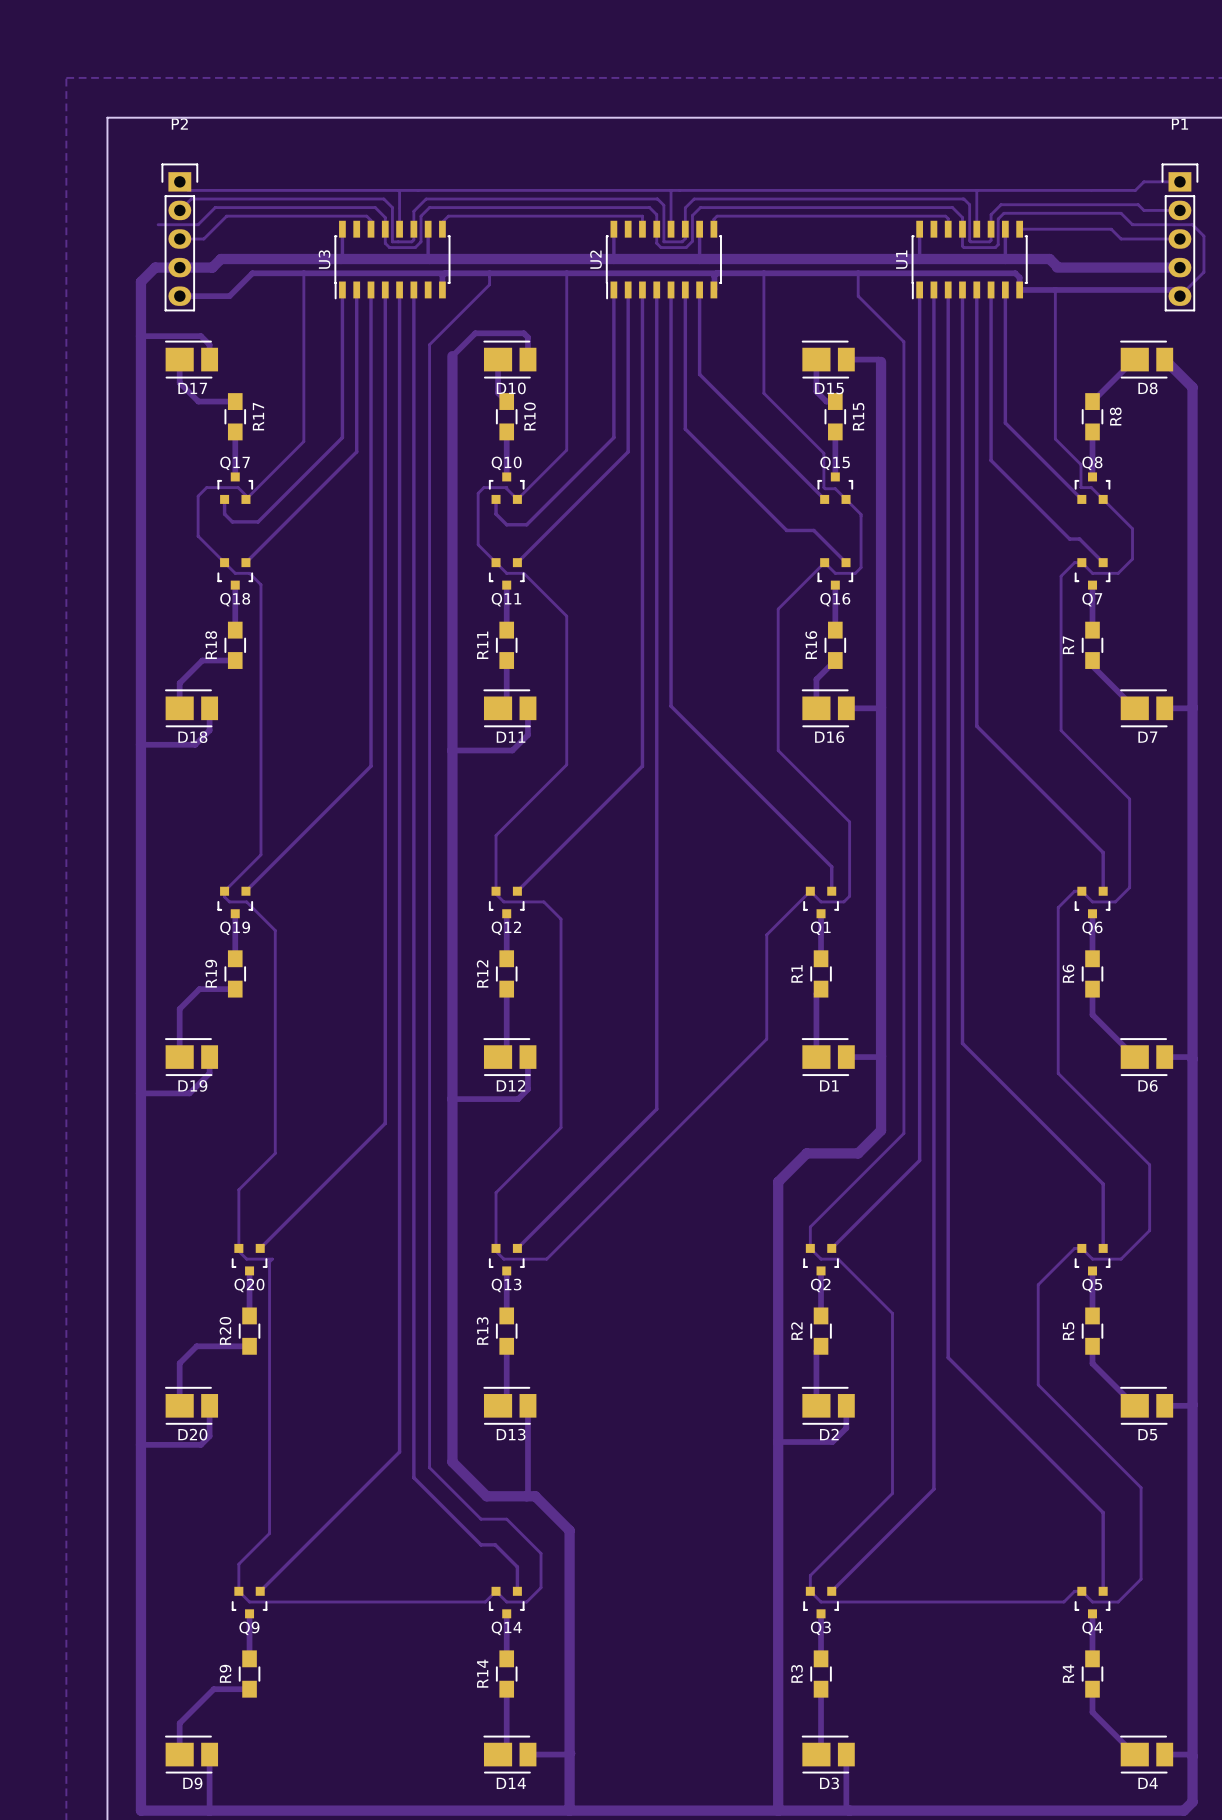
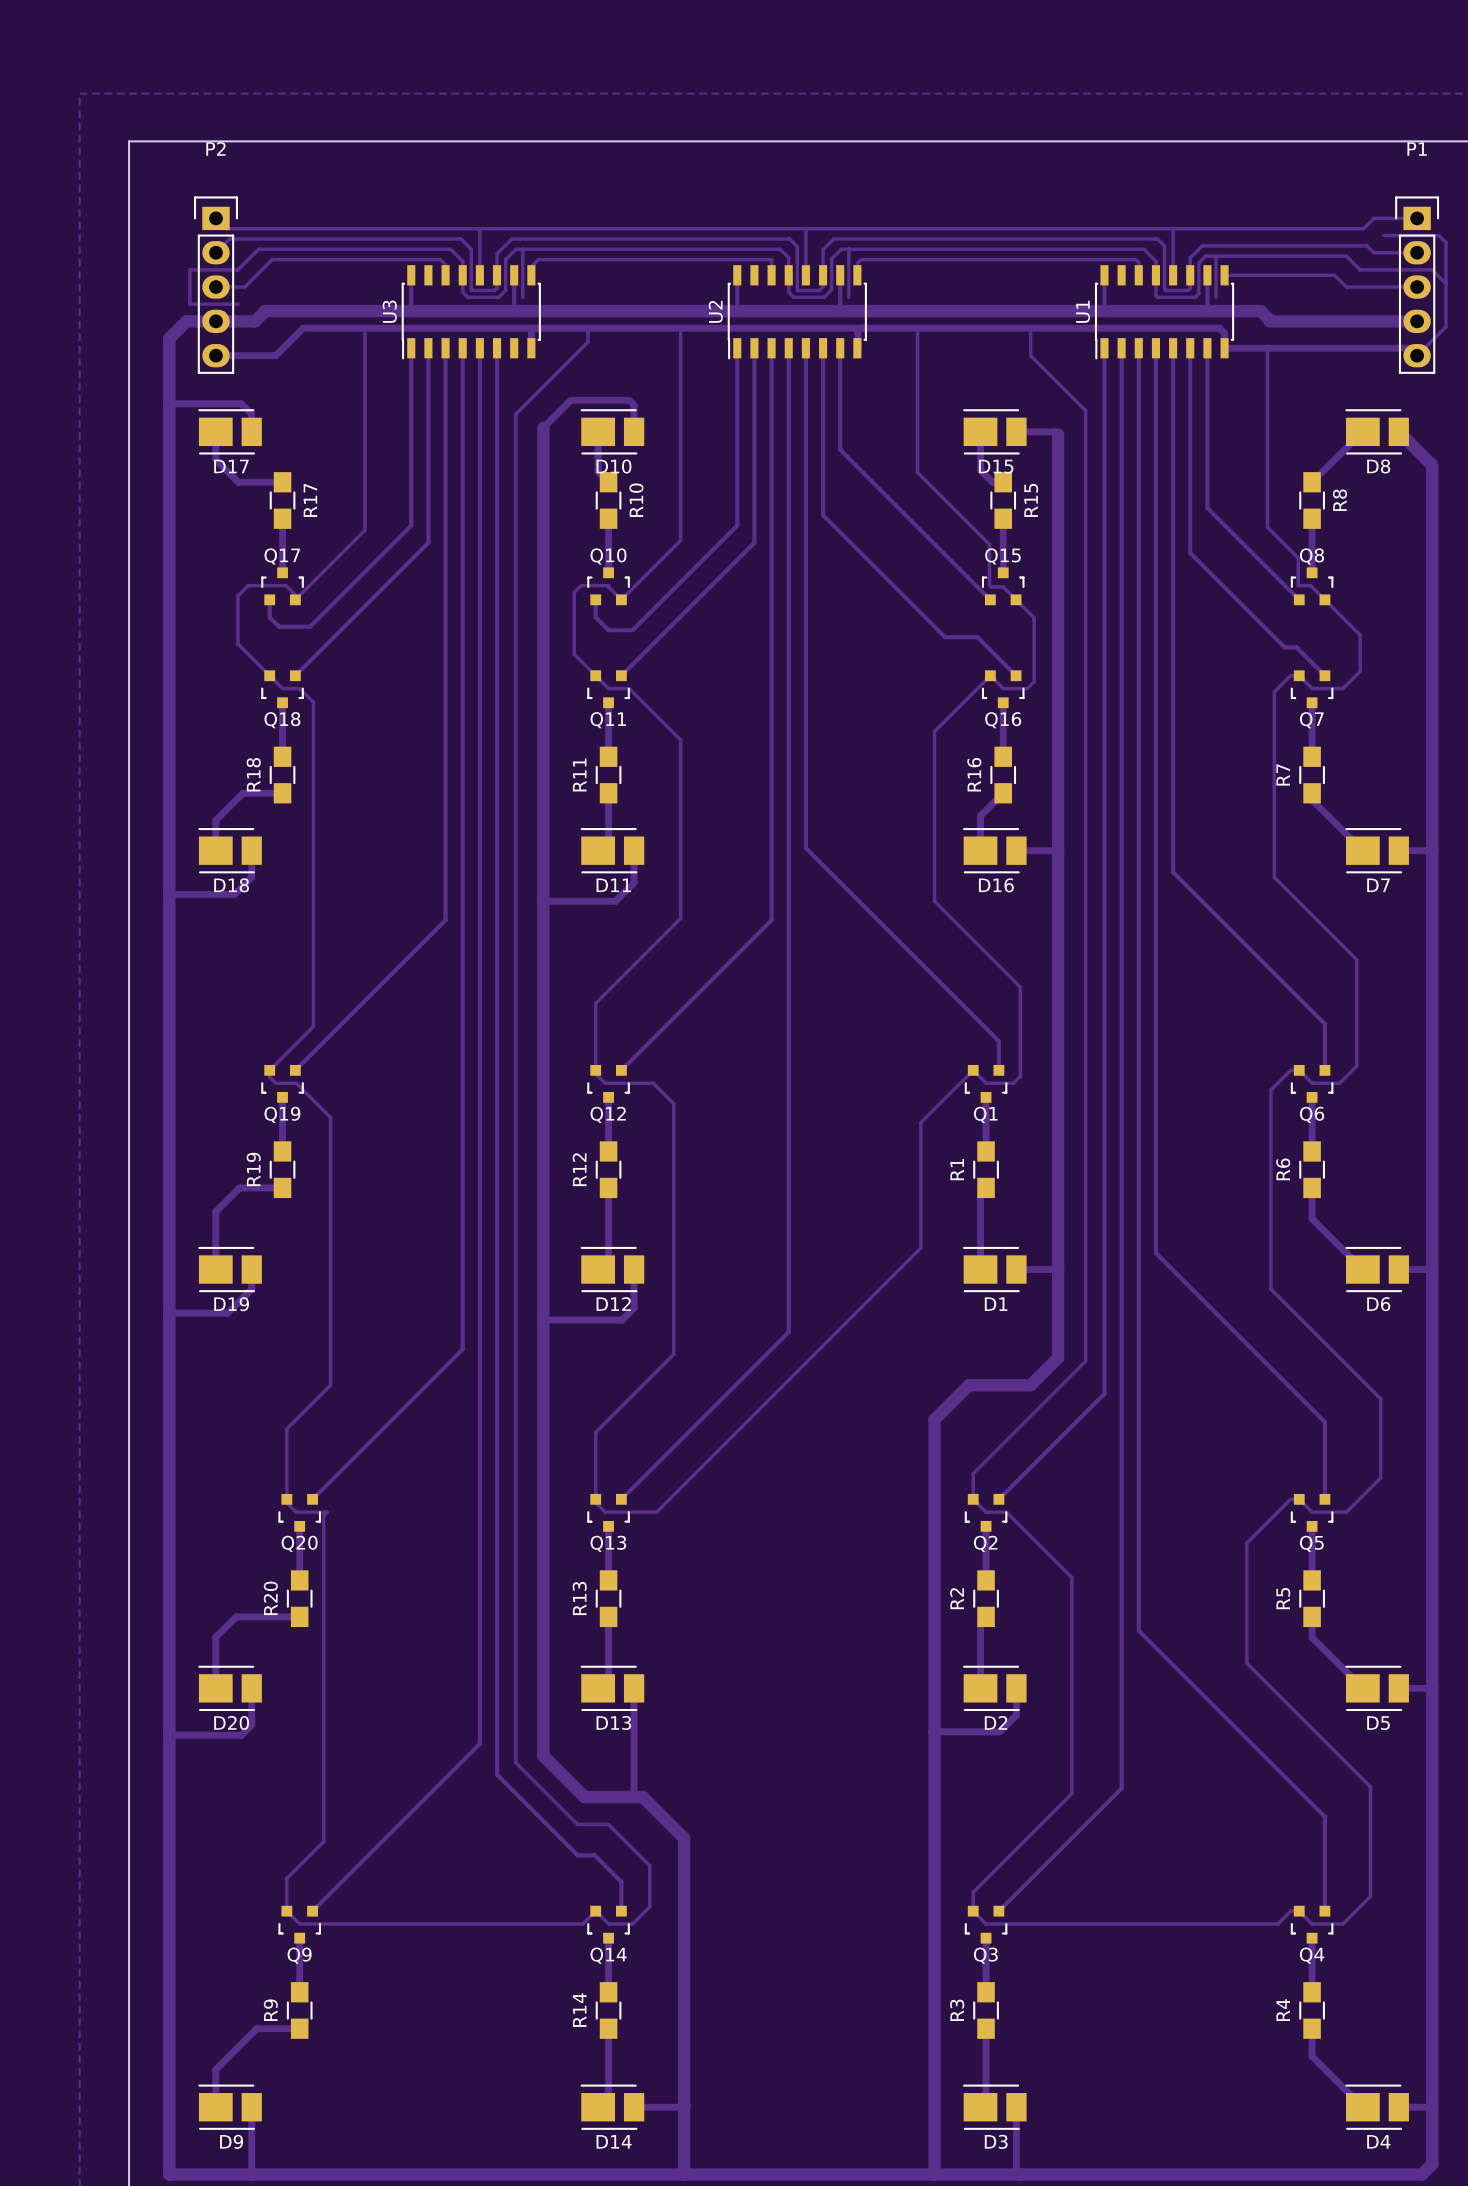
track: none -> (1384, 235) (1439, 235) (1445, 242) (1445, 283)
track: none -> (522, 249) (522, 297)
track: none -> (848, 249) (848, 297)
track: none -> (1216, 256) (1216, 297)
track: none -> (189, 269) (189, 304) (237, 304)

